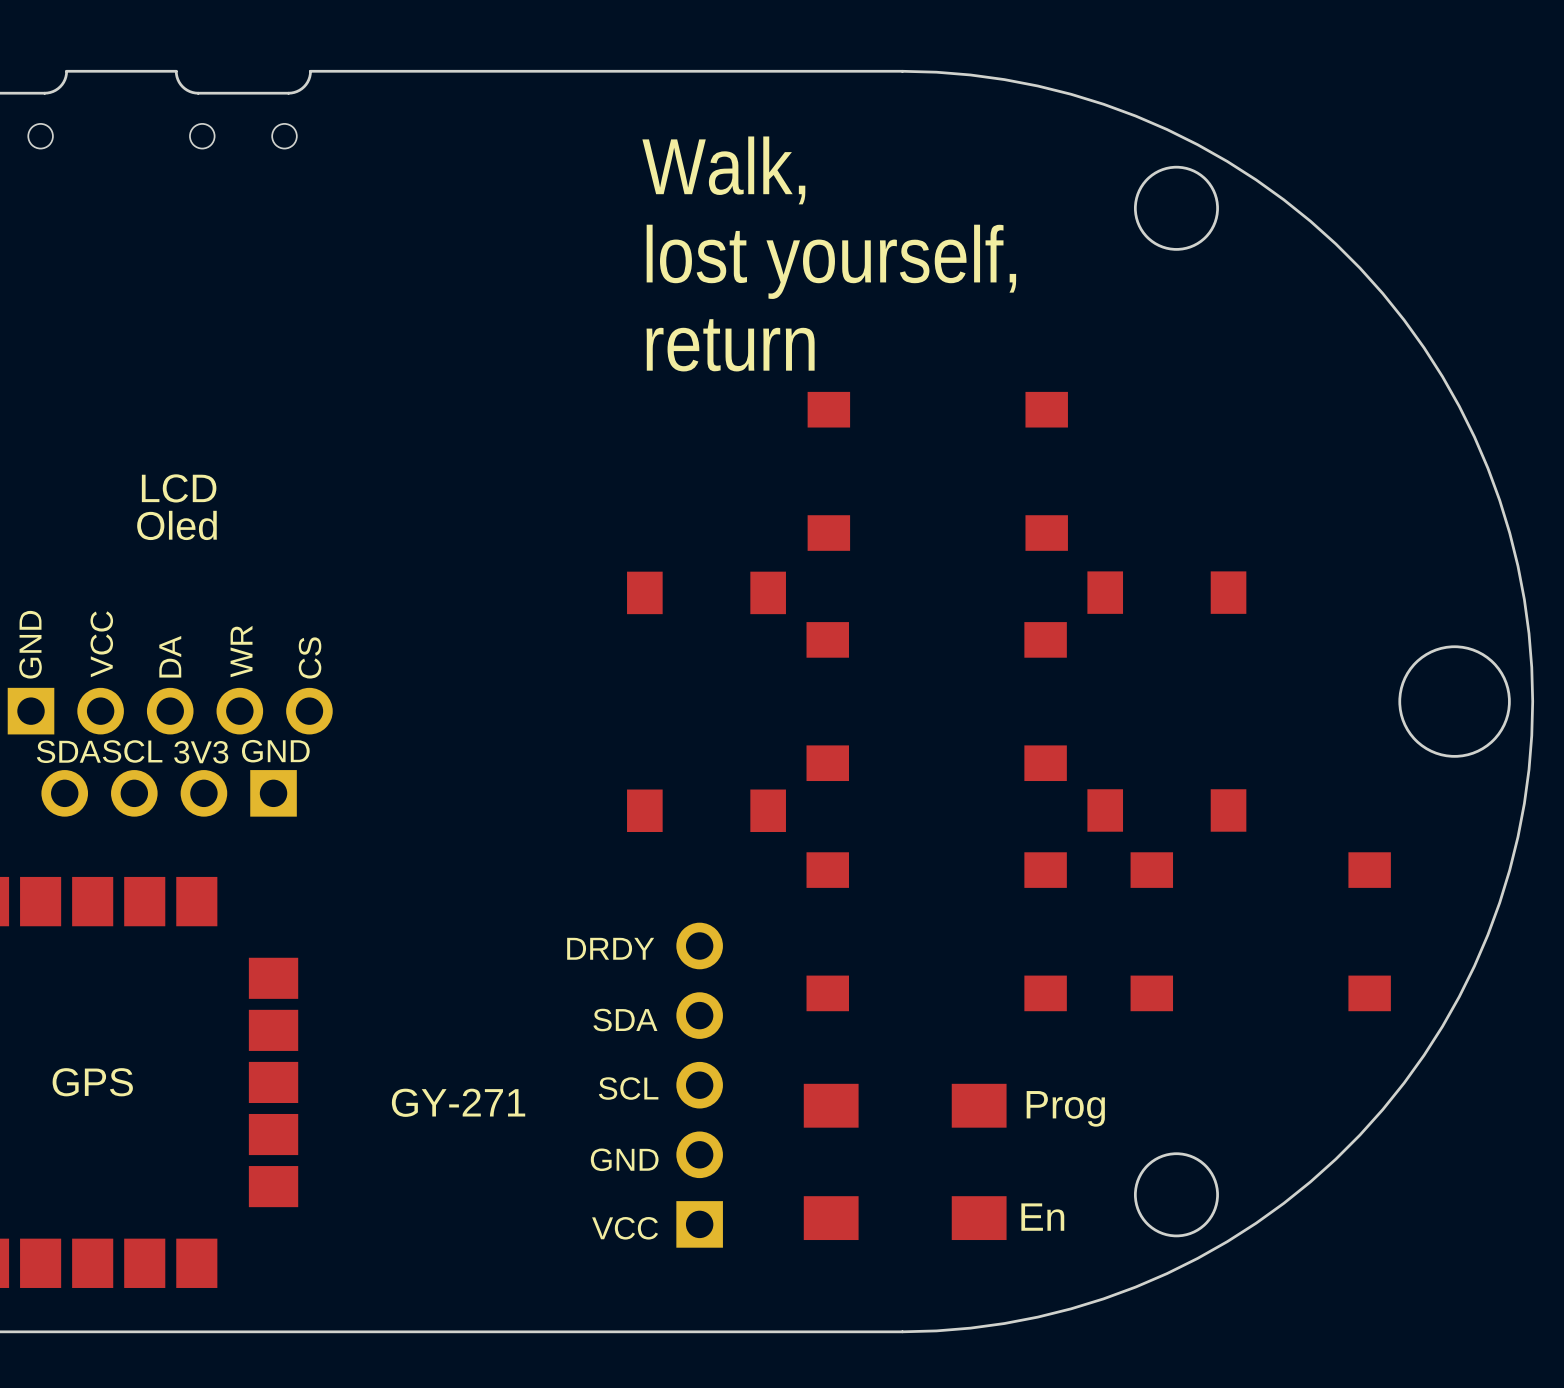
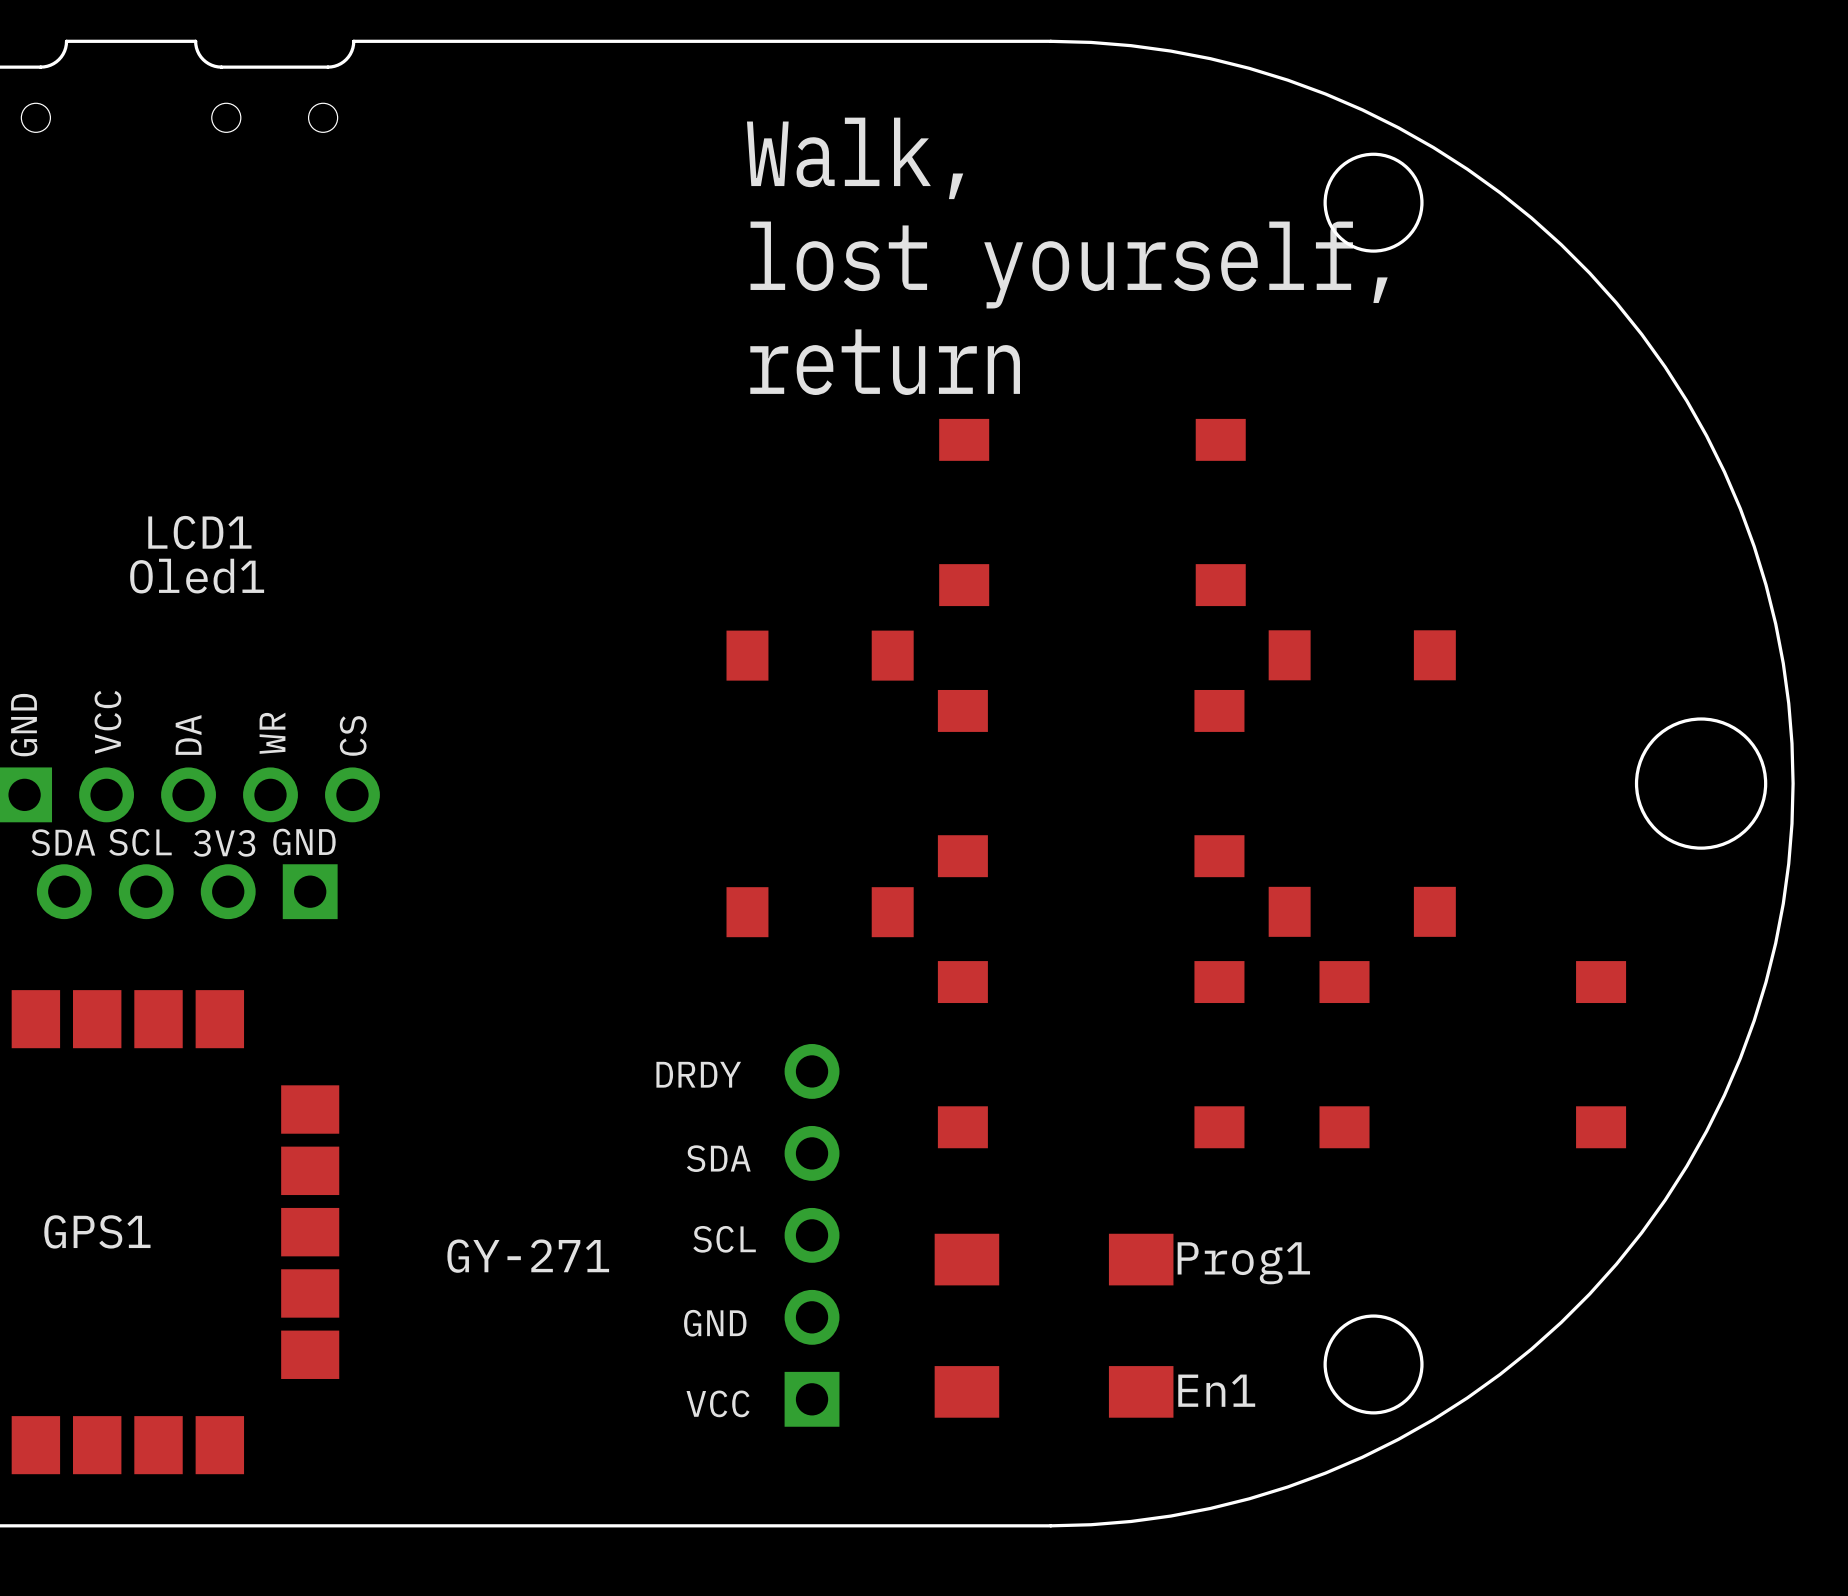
LCD name: LCD (179, 488) -> LCD1 (199, 532)
Oled name: Oled (177, 525) -> Oled1 (197, 576)
GPS name: GPS (92, 1082) -> GPS1 (97, 1231)
Prog name: Prog (1065, 1108) -> Prog1 (1243, 1263)
En name: En (1042, 1217) -> En1 (1216, 1390)

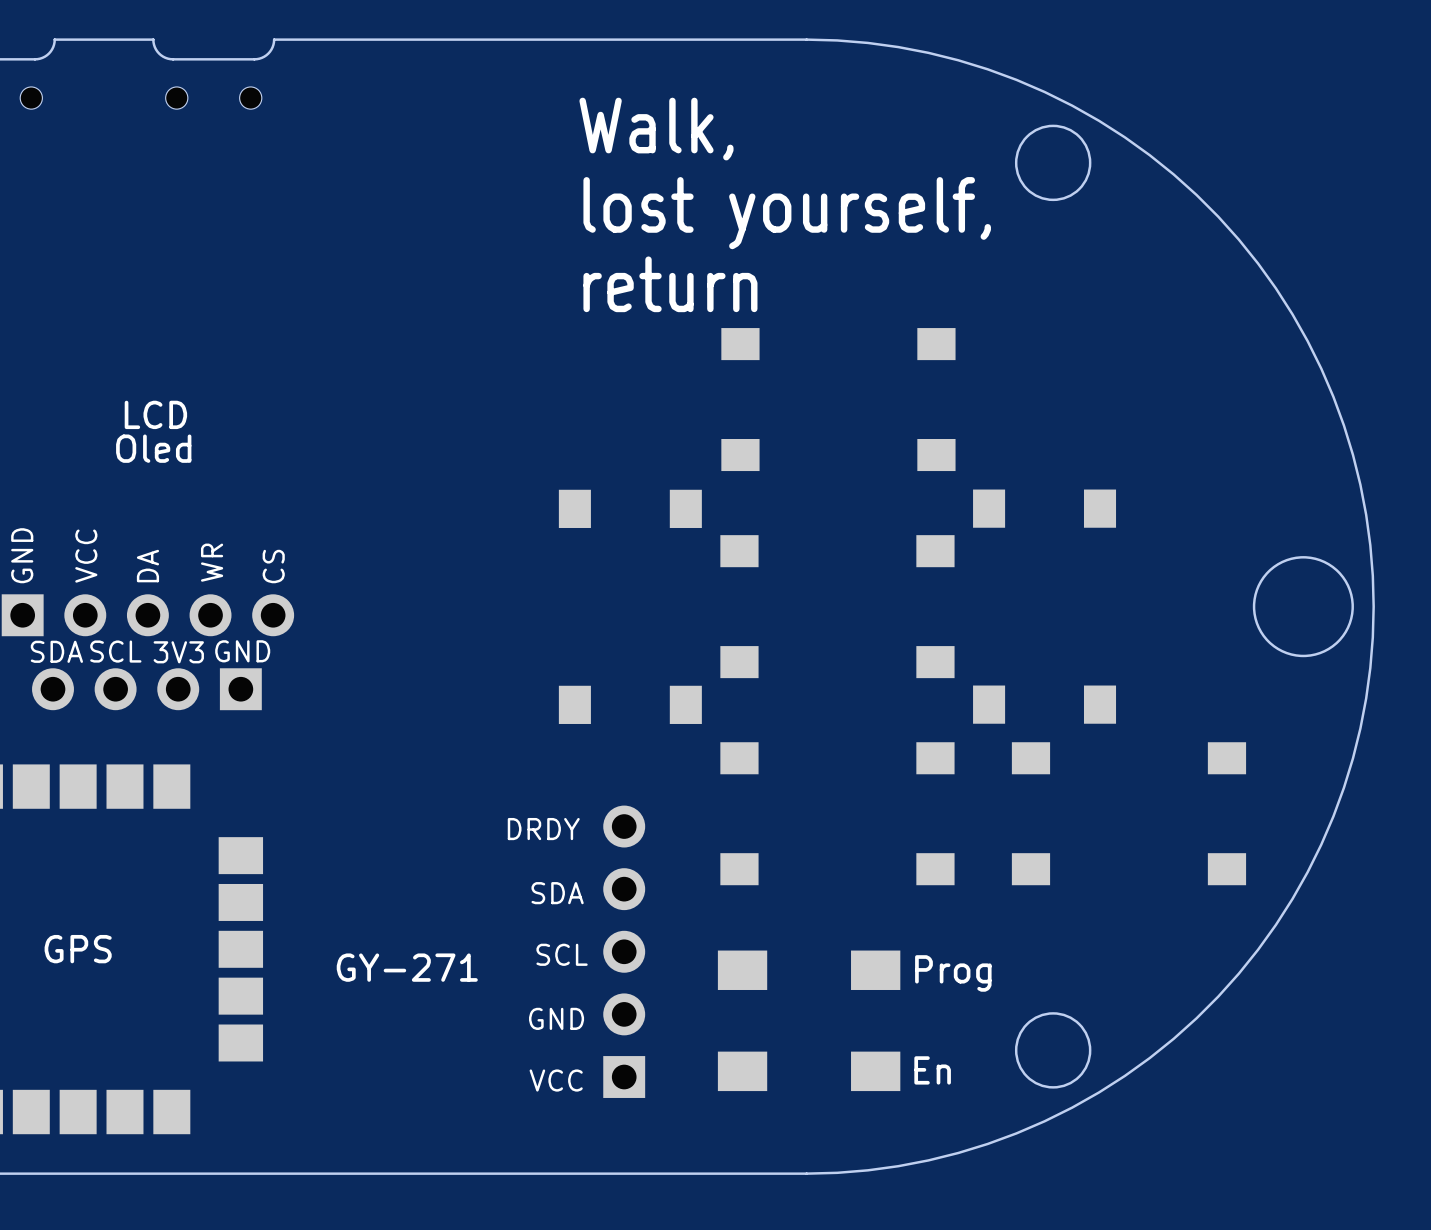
LCD1 name: LCD1 (199, 532) -> LCD (155, 414)
Oled1 name: Oled1 (197, 576) -> Oled (153, 448)
GPS1 name: GPS1 (97, 1231) -> GPS (78, 949)
Prog1 name: Prog1 (1243, 1263) -> Prog (953, 973)
En1 name: En1 (1216, 1390) -> En (932, 1070)

